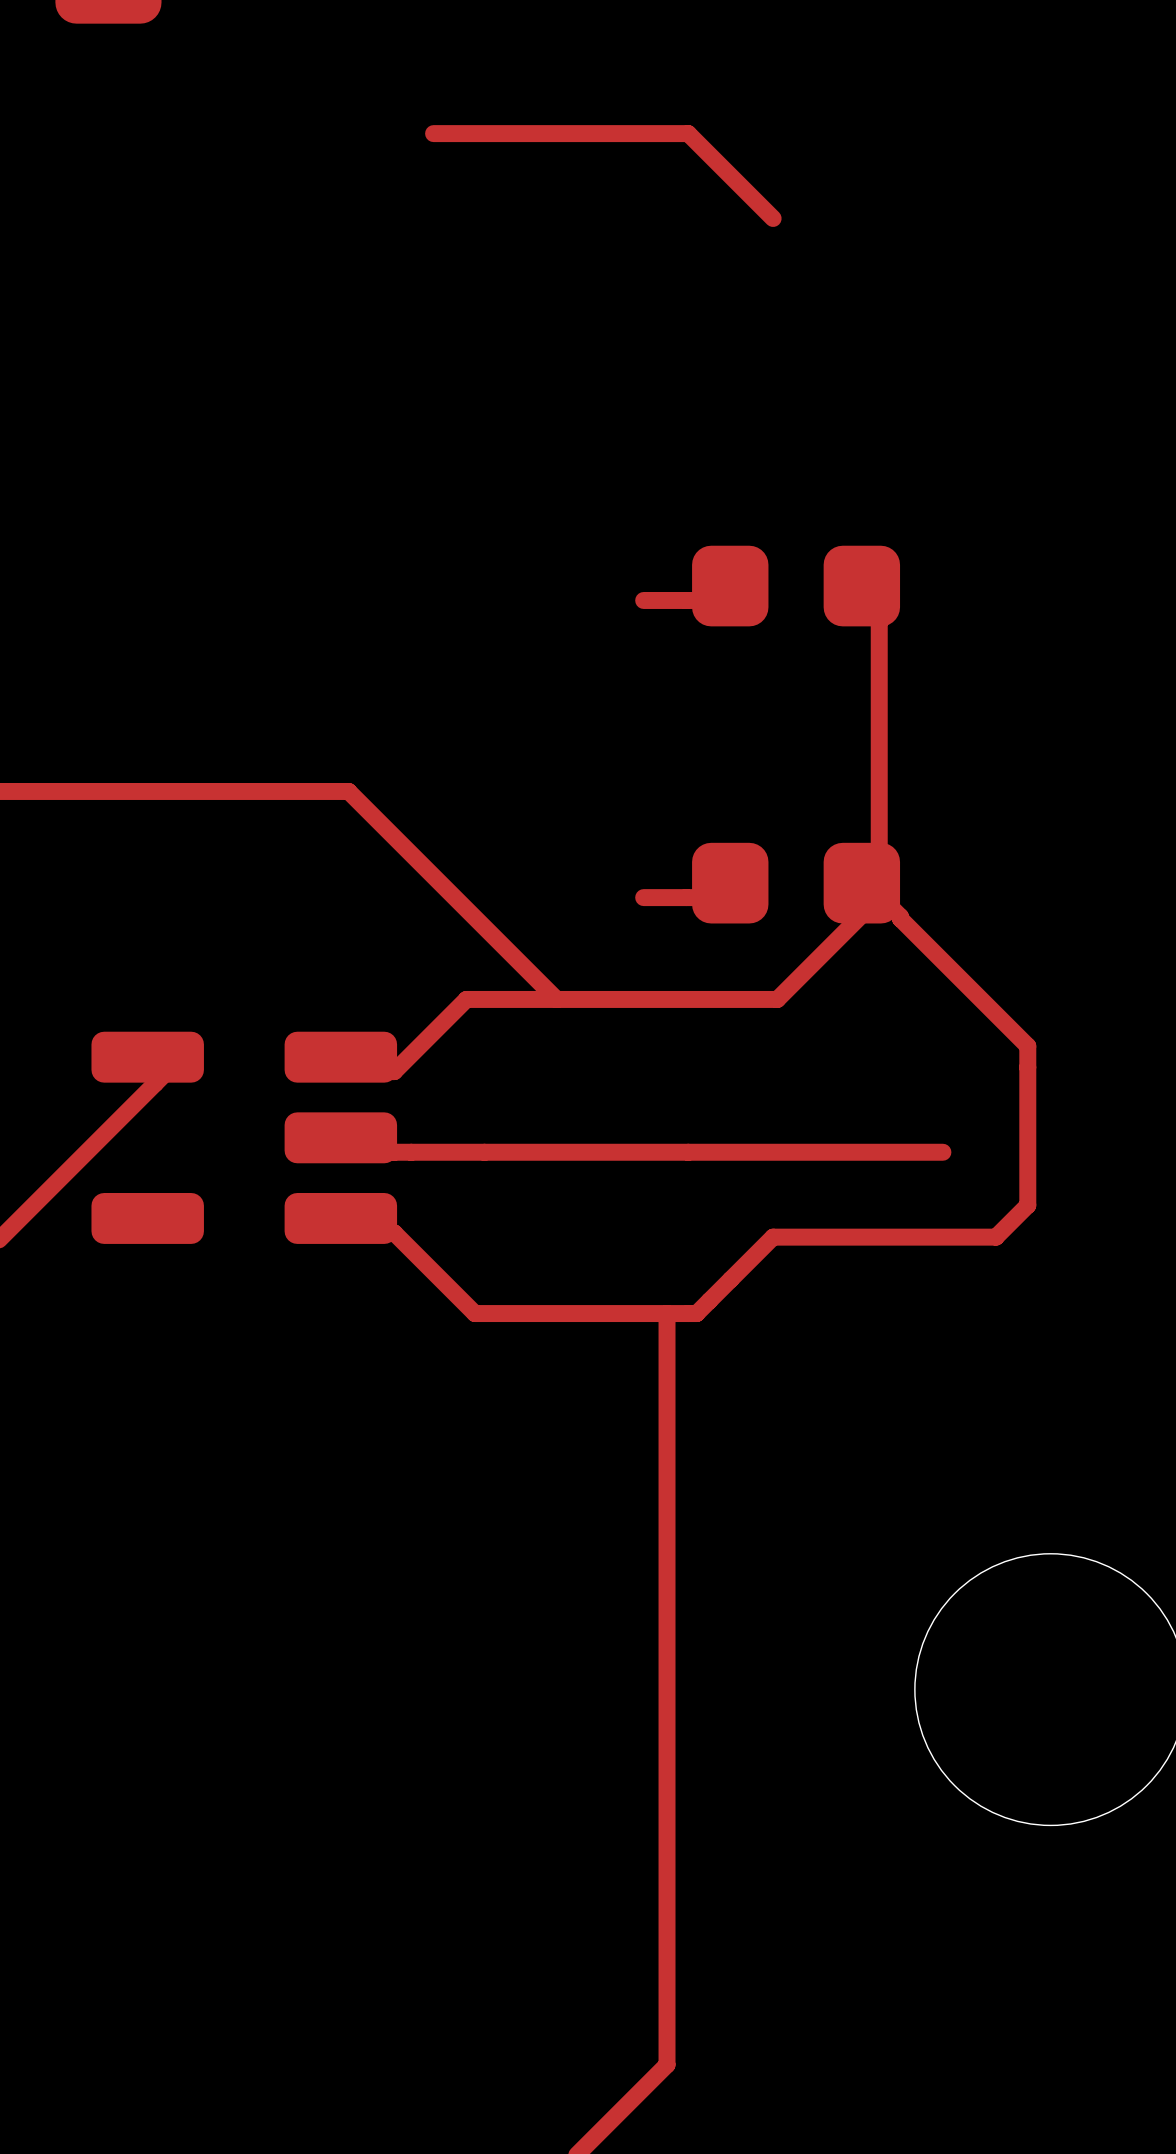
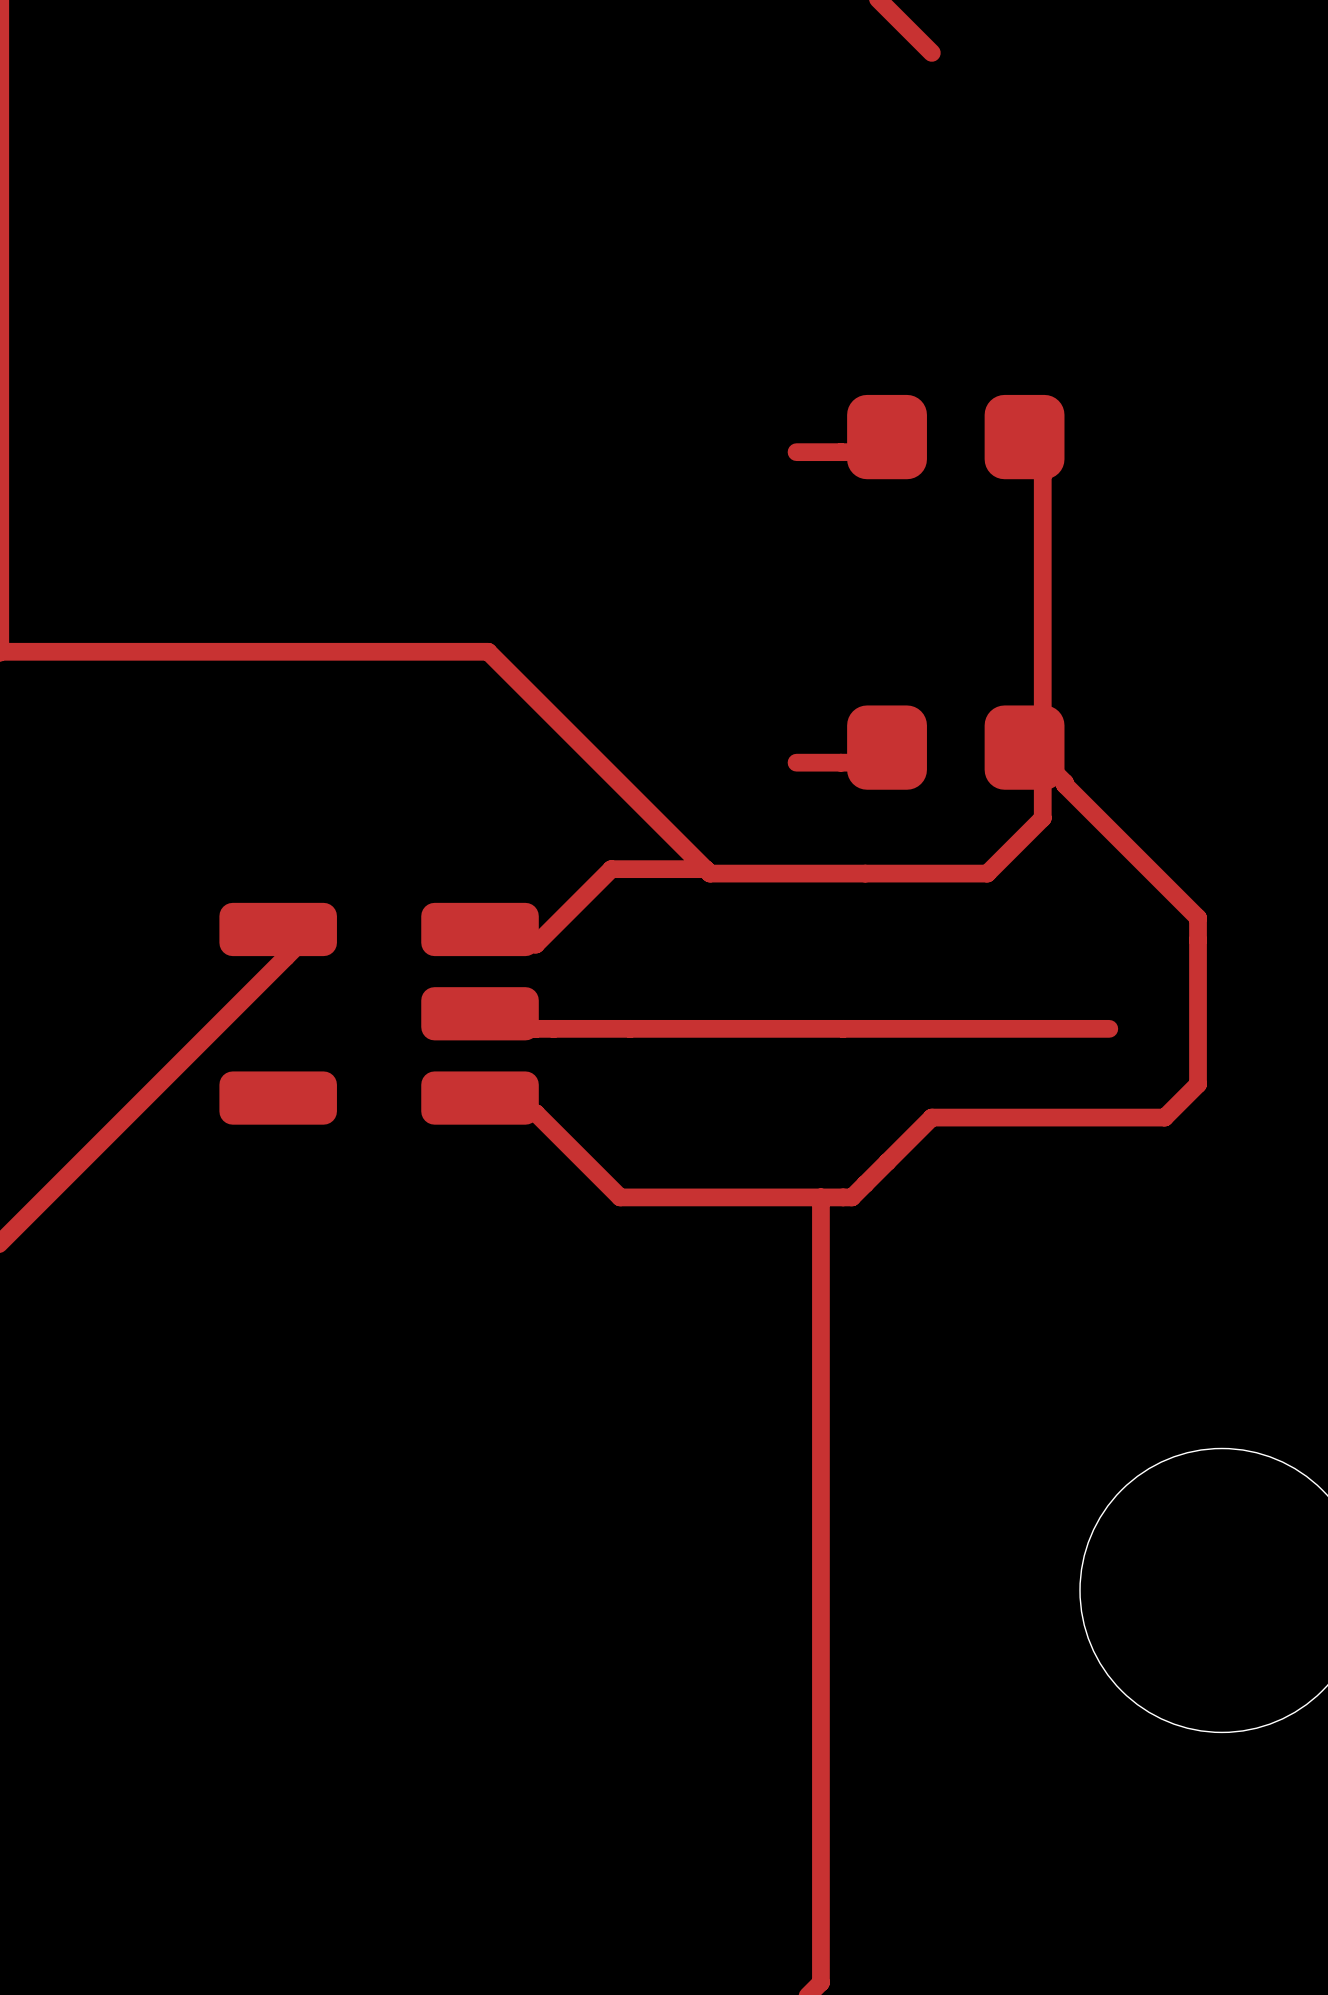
top track: (879, 897) (777, 999) (556, 999) -> (1042, 762) (1042, 818) (987, 873) (710, 873) (705, 869)

